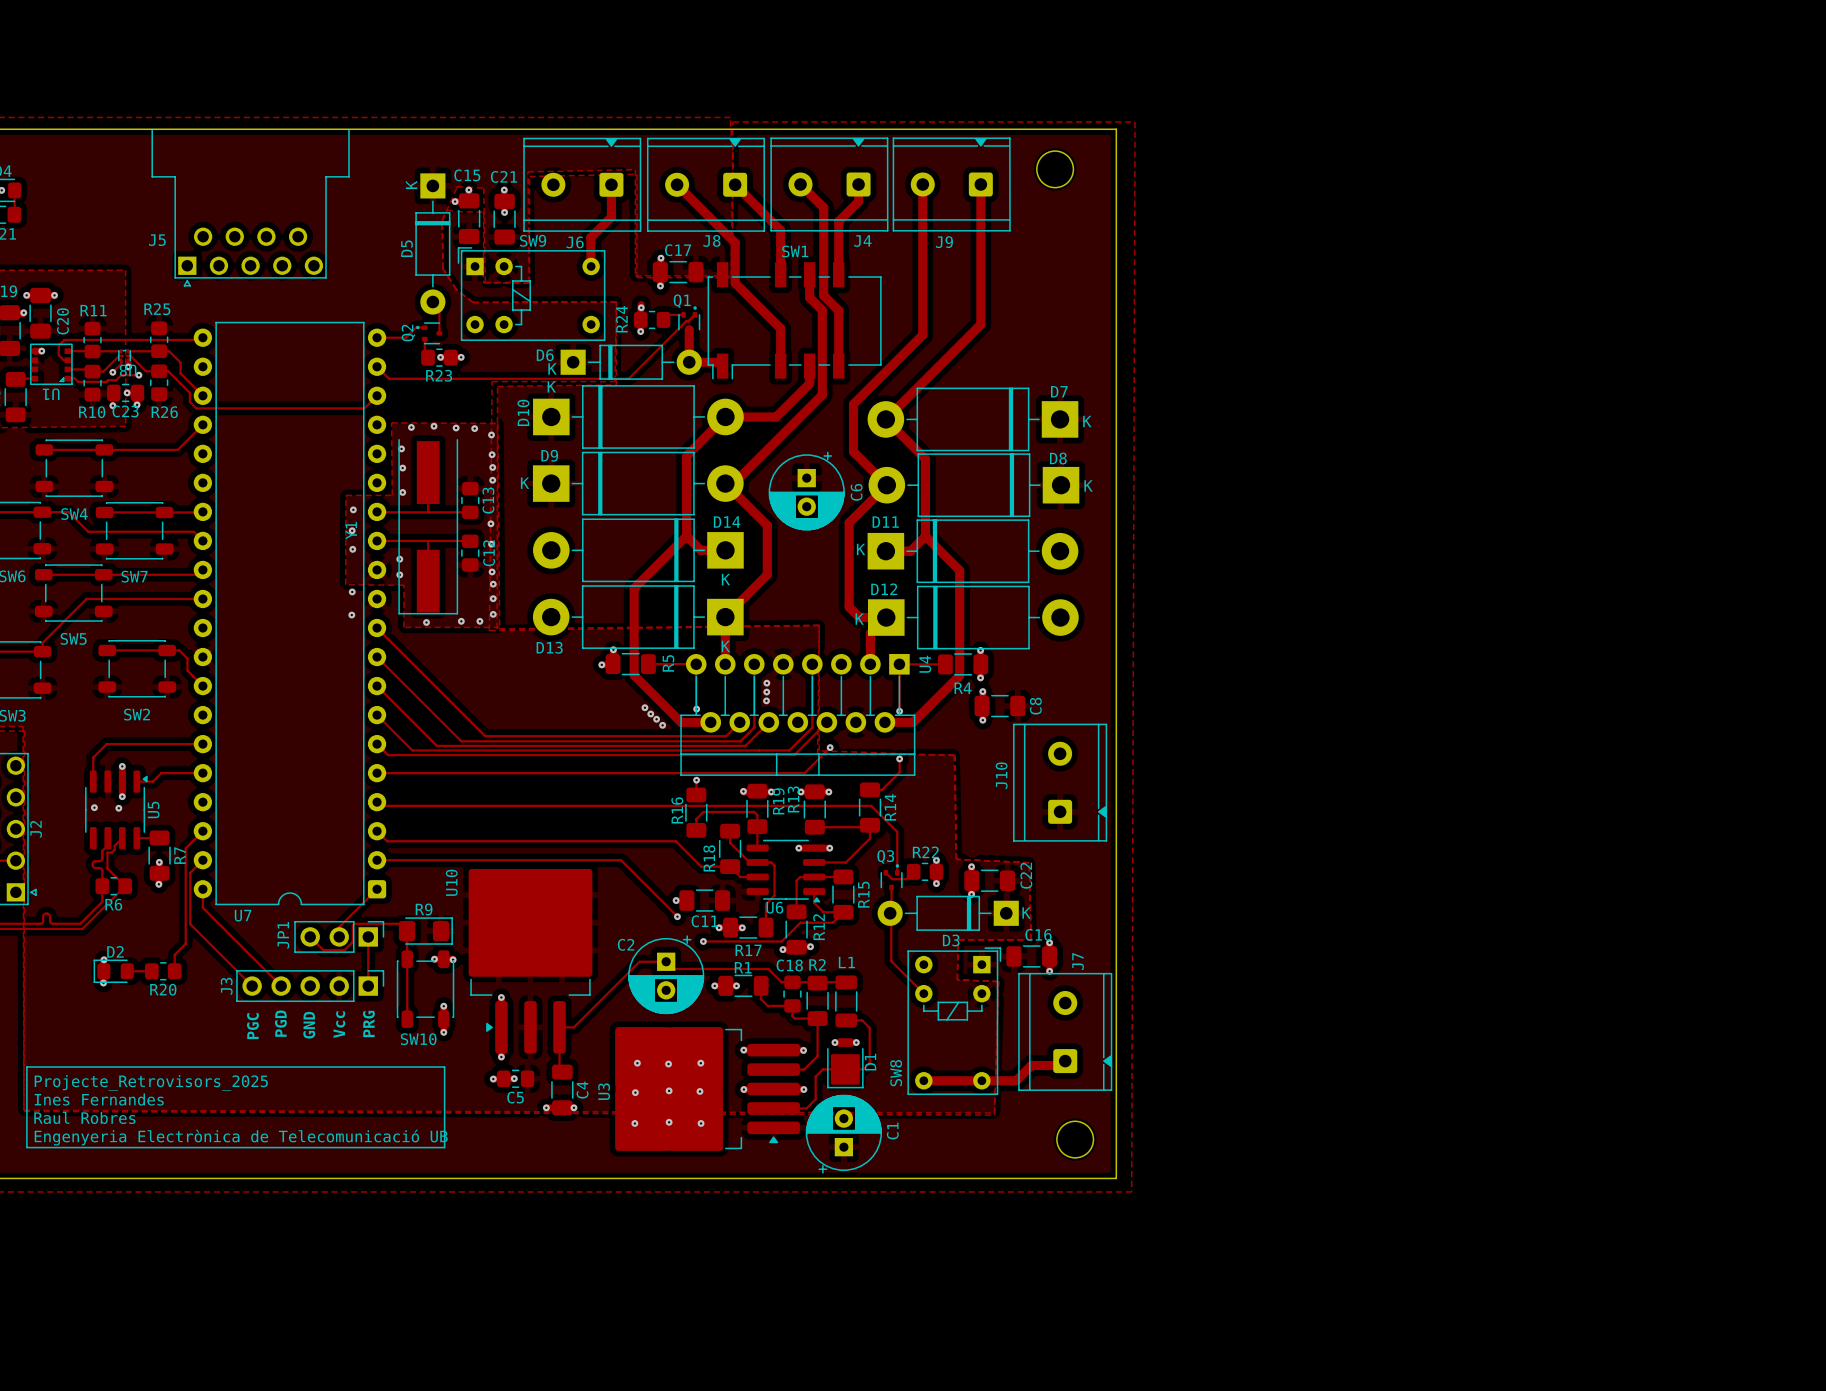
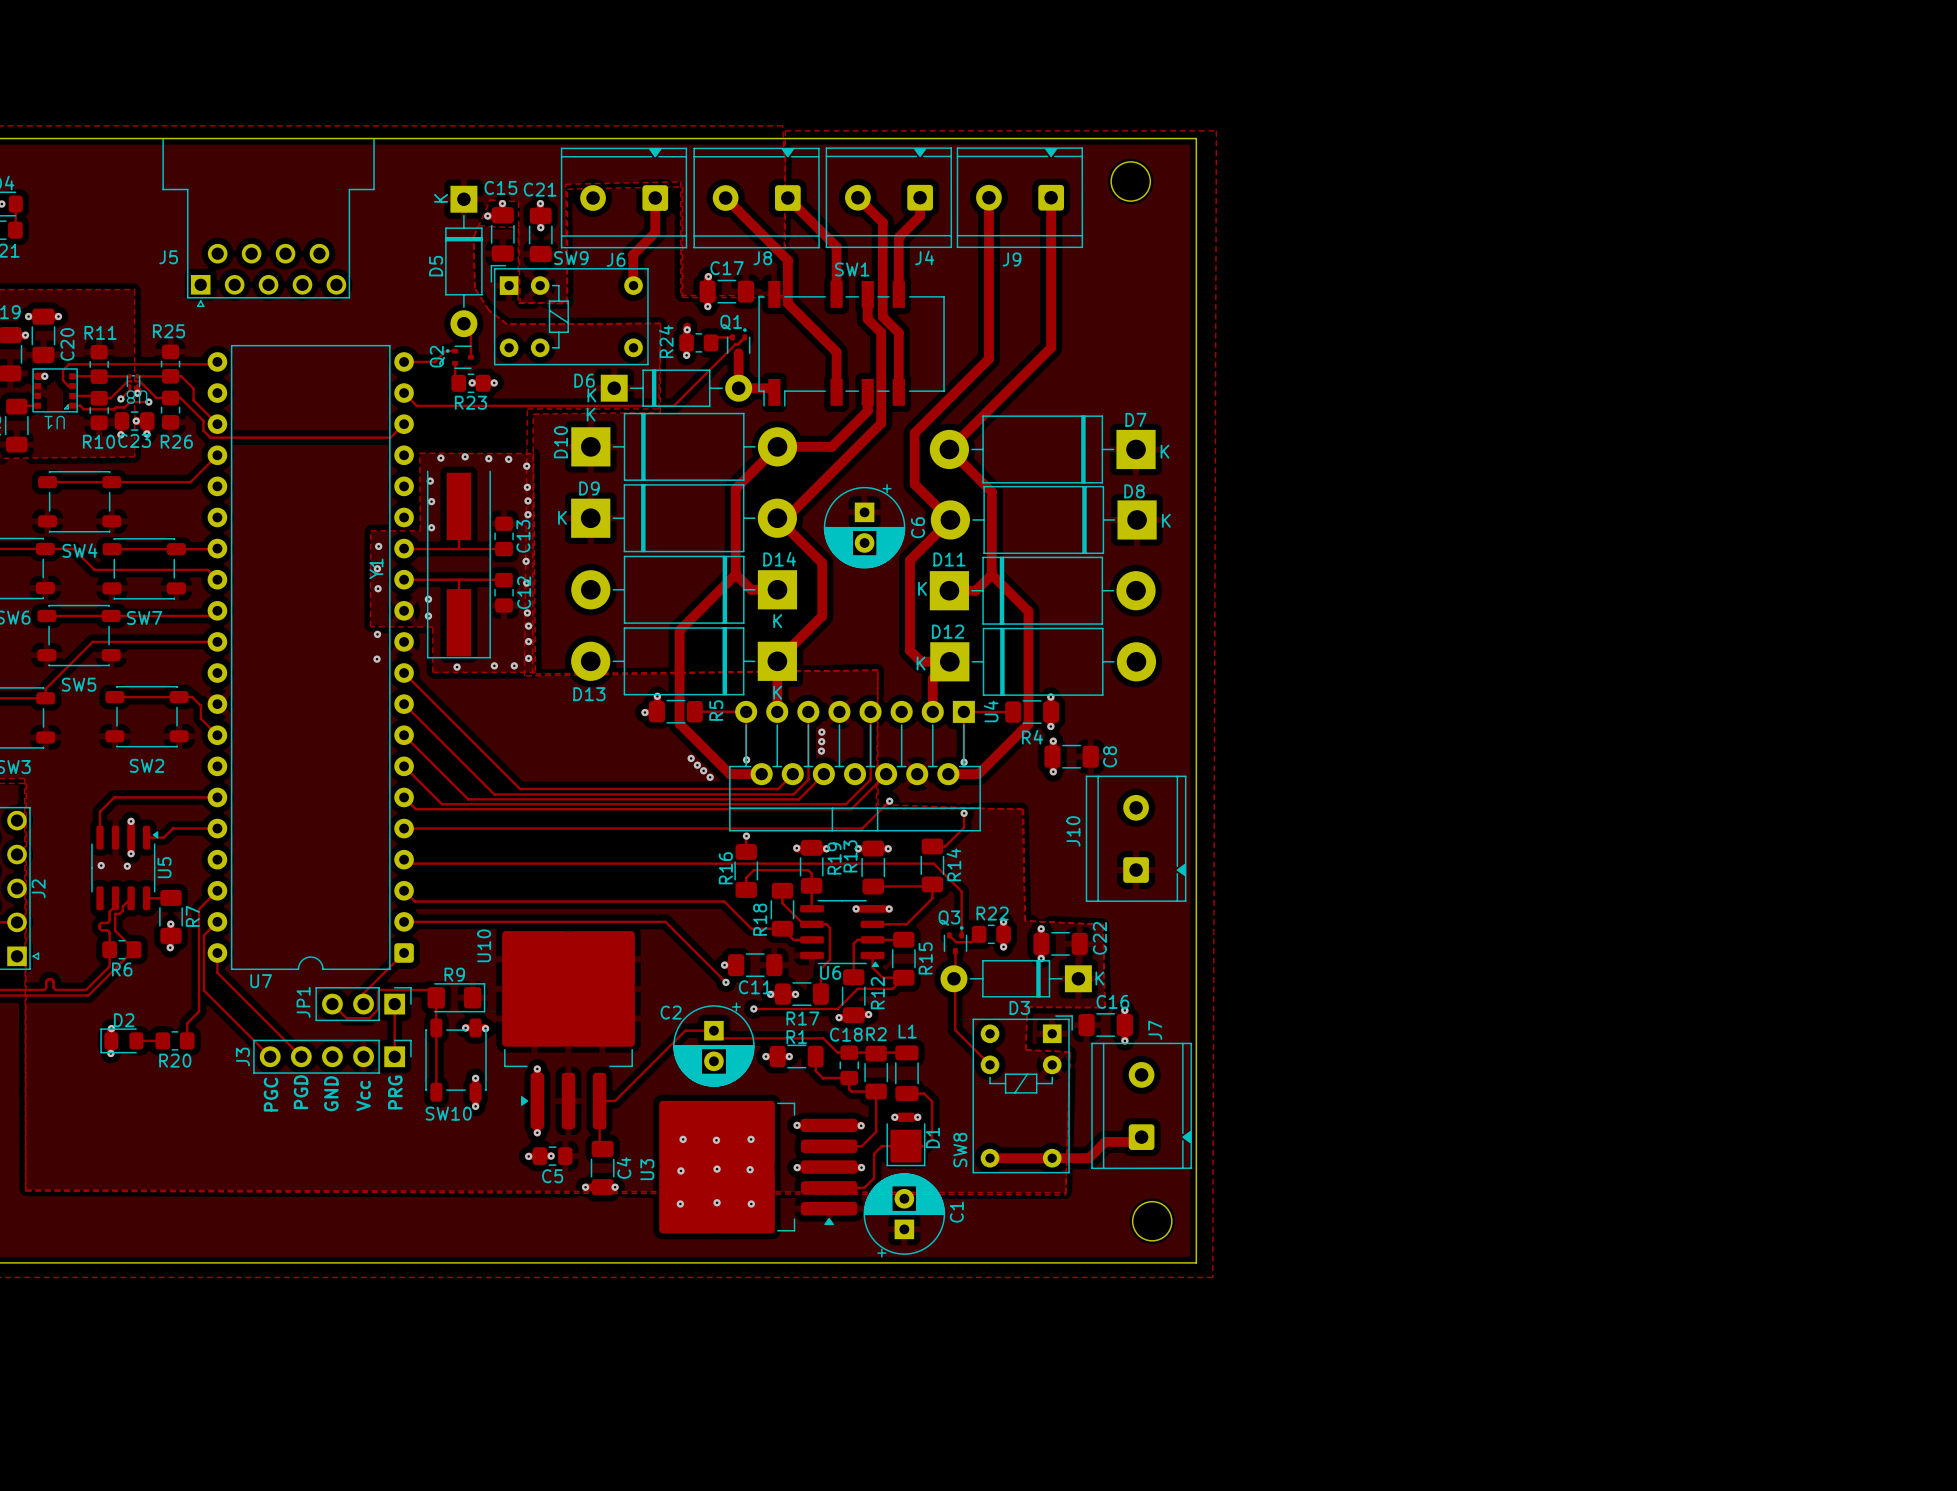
line: (26, 1067) (444, 1067) (444, 1147) (26, 1147) (26, 1067) -> none
text: Projecte_Retrovisors_2025 (151, 1082) -> none
text: Ines Fernandes (99, 1099) -> none
text: Raul Robres (84, 1117) -> none
text: Engenyeria Electrònica de Telecomunicació UB (241, 1137) -> none

